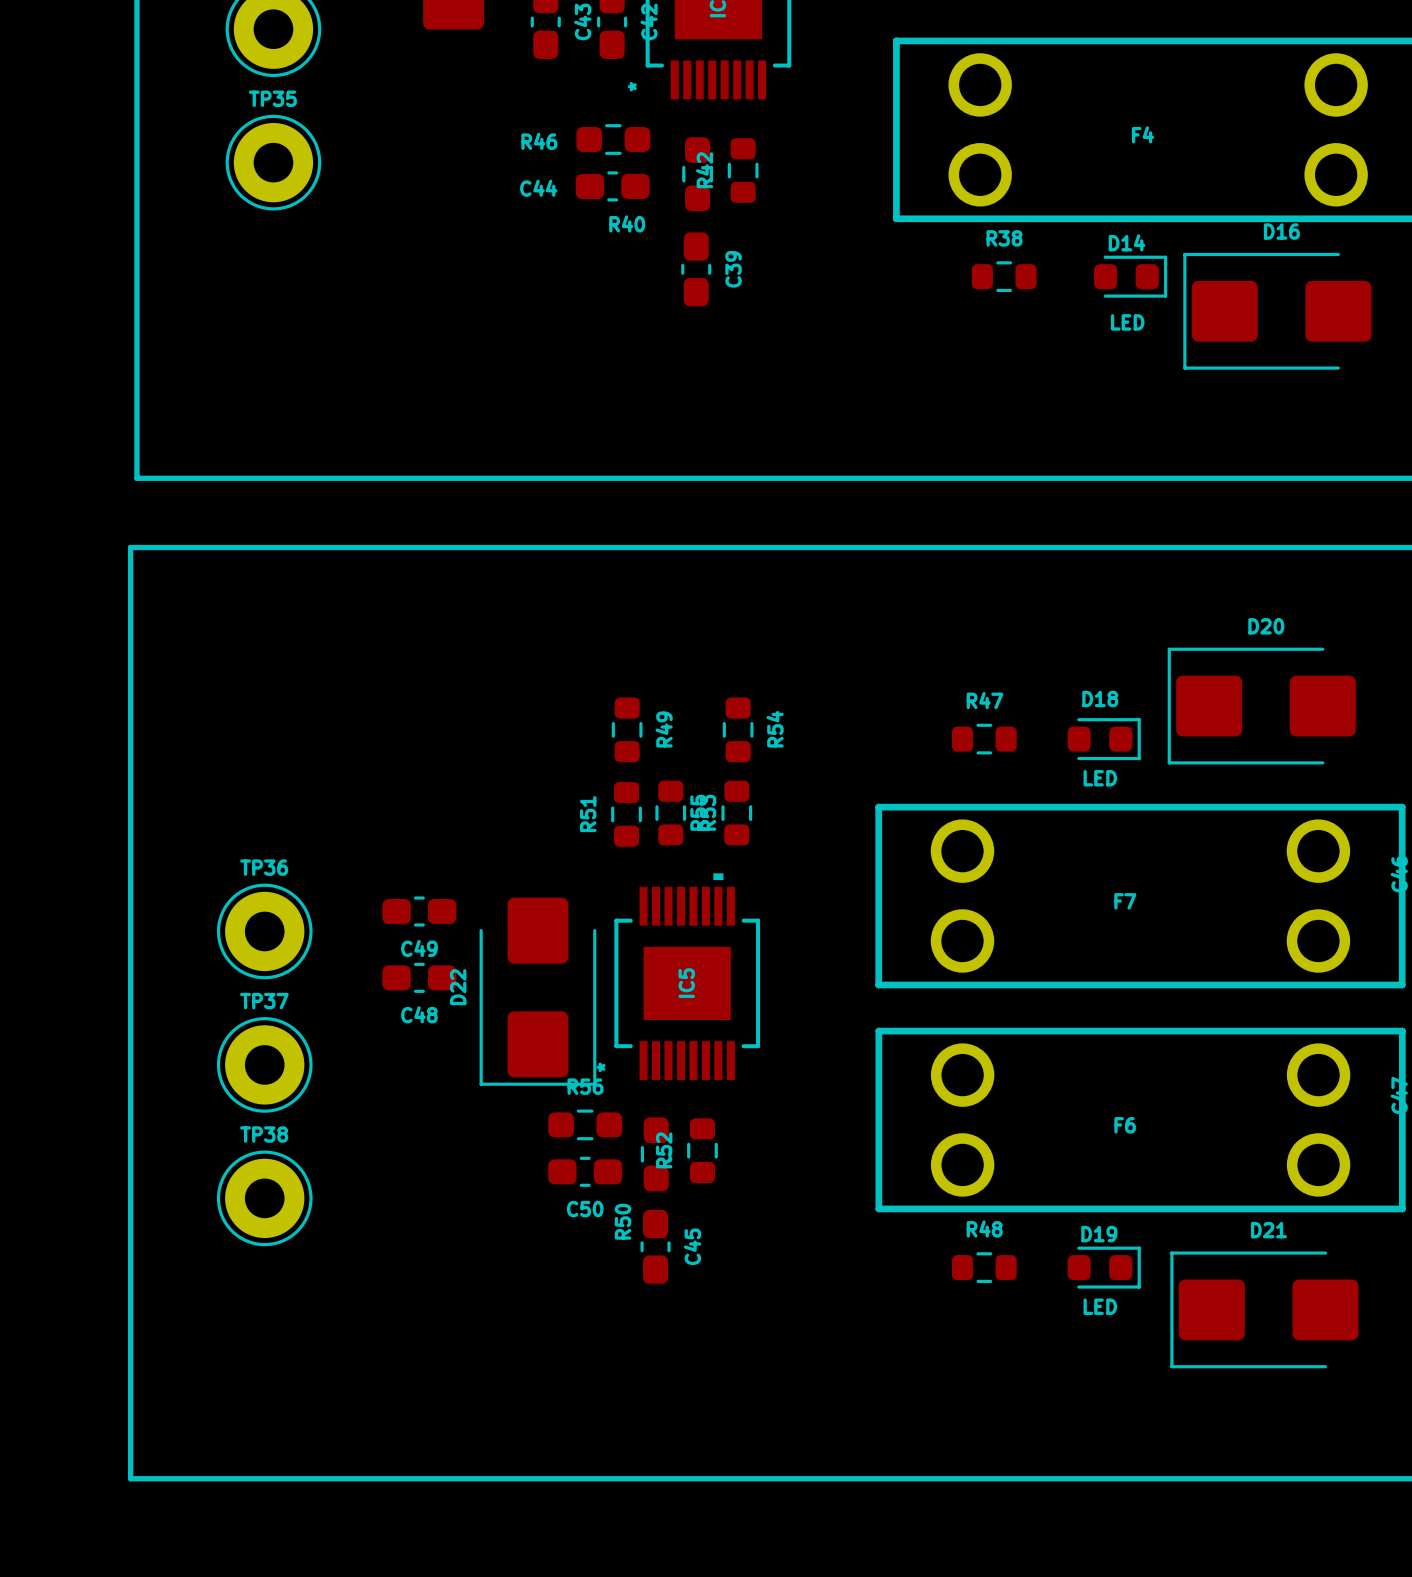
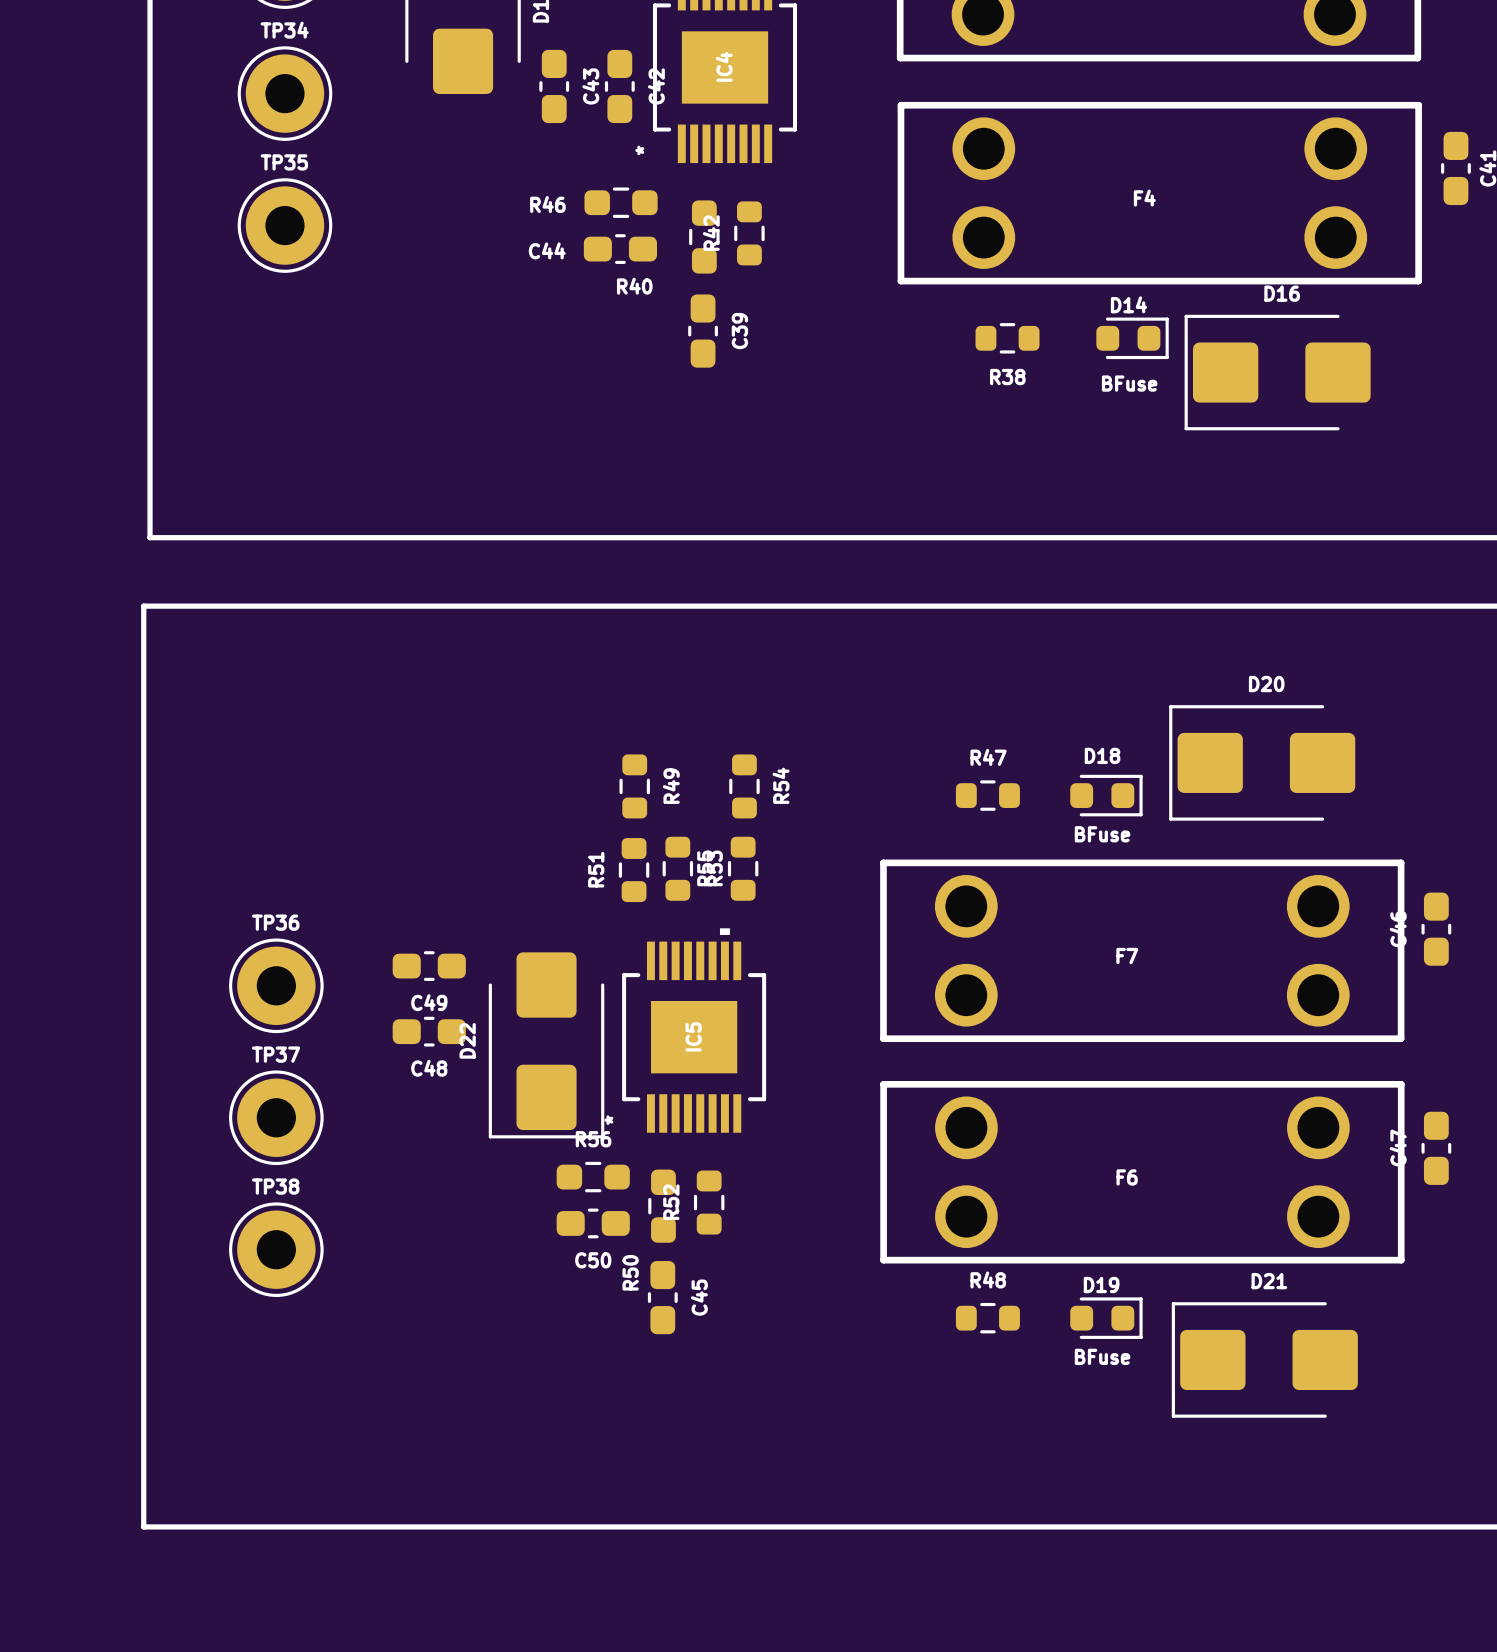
R38 name position: R38 (1004, 238) -> R38 (1007, 377)
D14 value: LED (1127, 322) -> BFuse (1129, 383)
D18 value: LED (1100, 778) -> BFuse (1102, 834)
D19 value: LED (1100, 1306) -> BFuse (1102, 1356)

